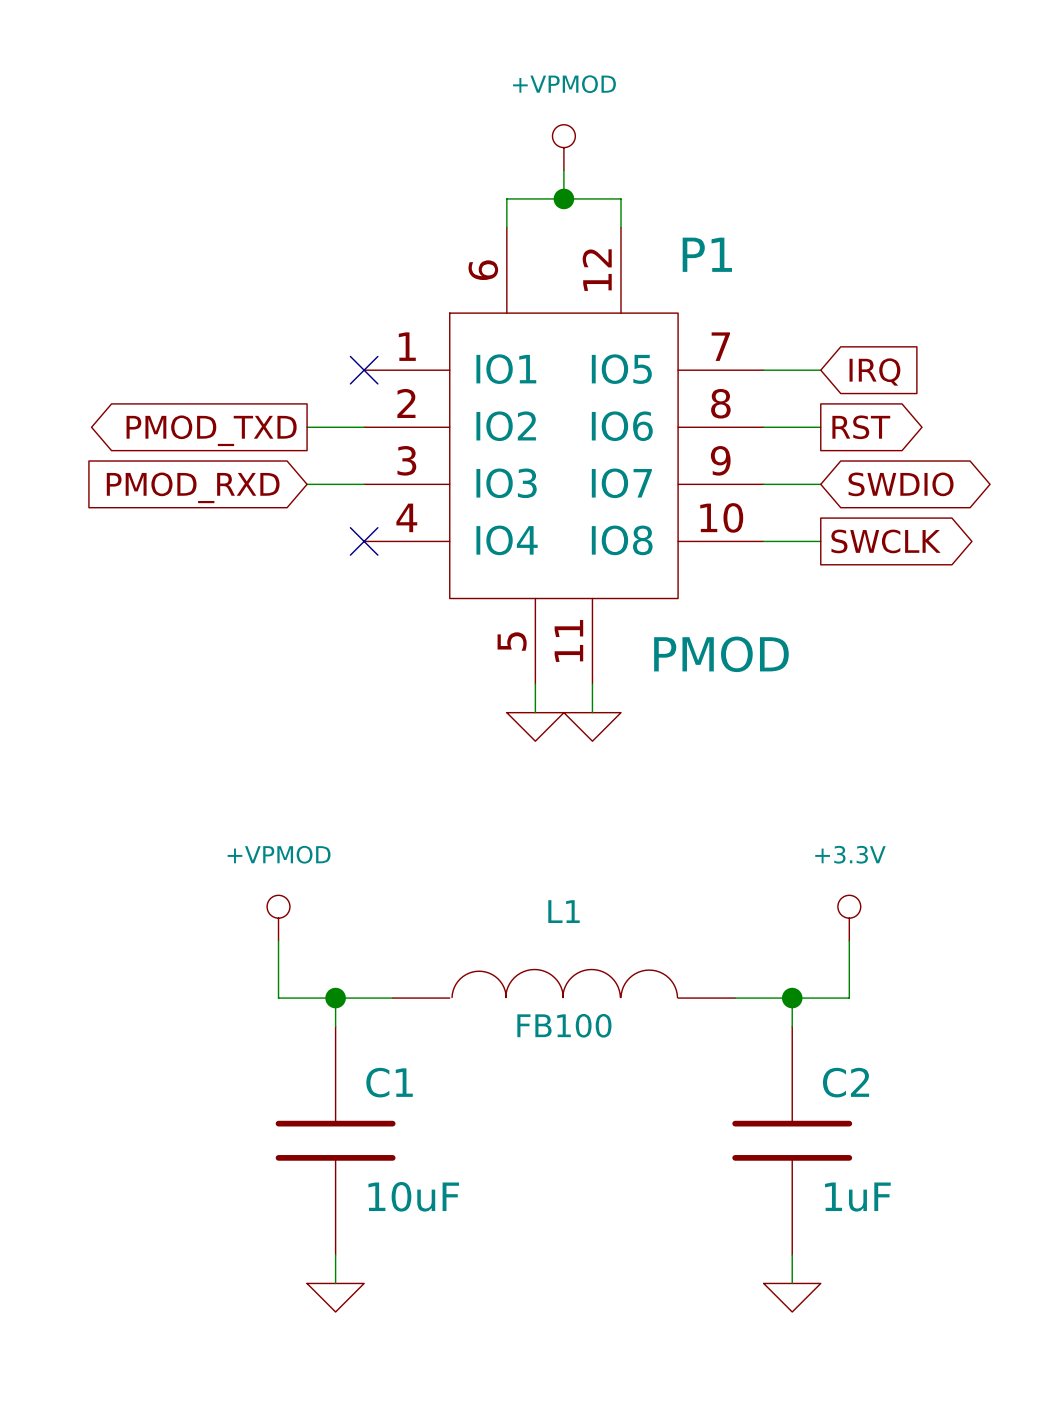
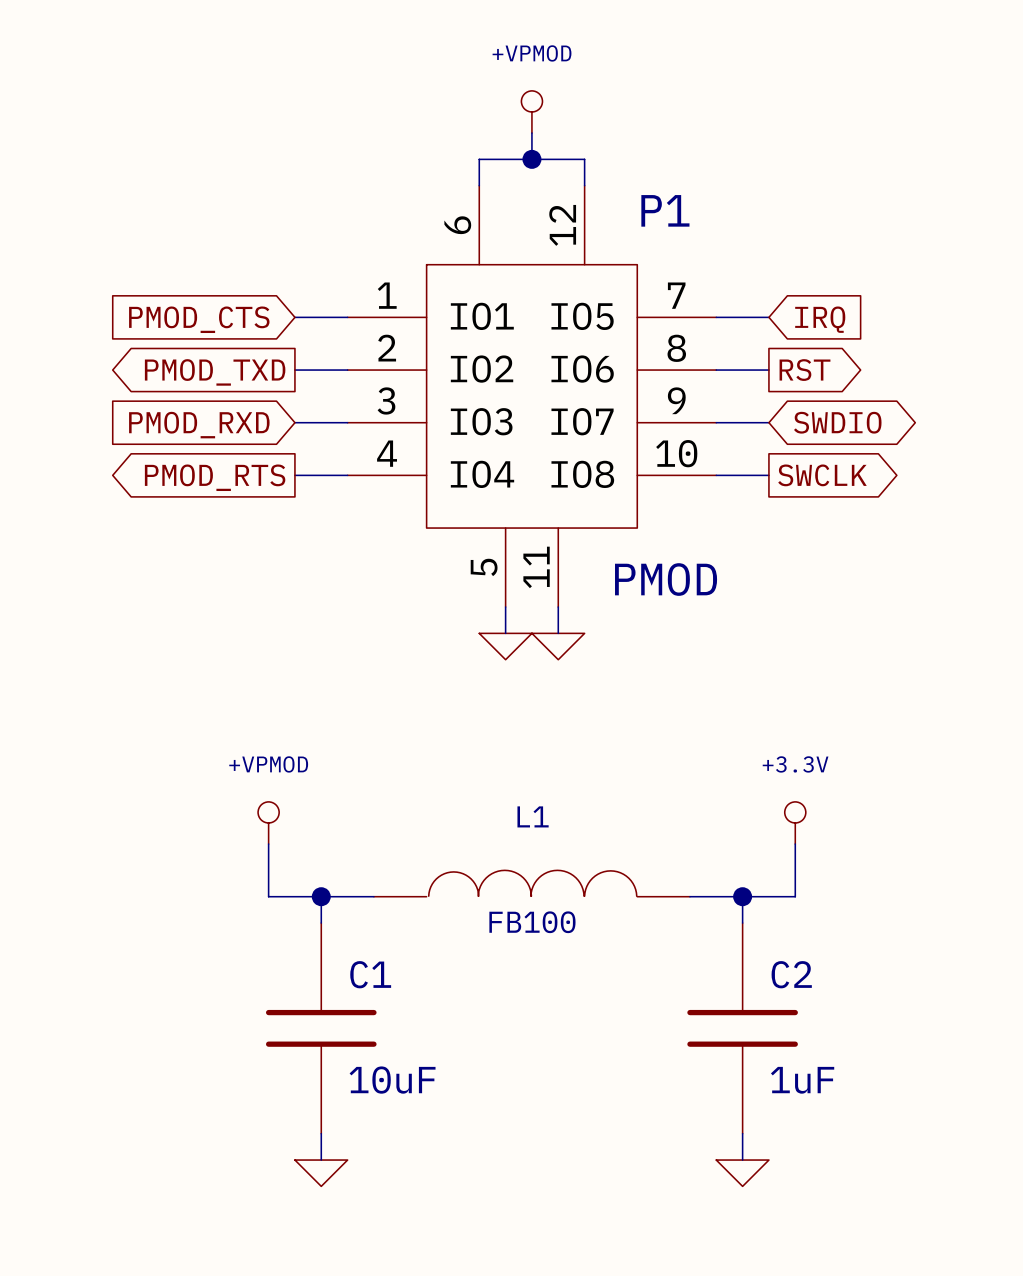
wire: none -> (294, 317) (347, 317)
no-connect mark: (364, 370) -> none
global label: none -> PMOD_CTS (199, 319)
wire: none -> (294, 475) (347, 475)
no-connect mark: (364, 541) -> none
global label: none -> PMOD_RTS (215, 477)

